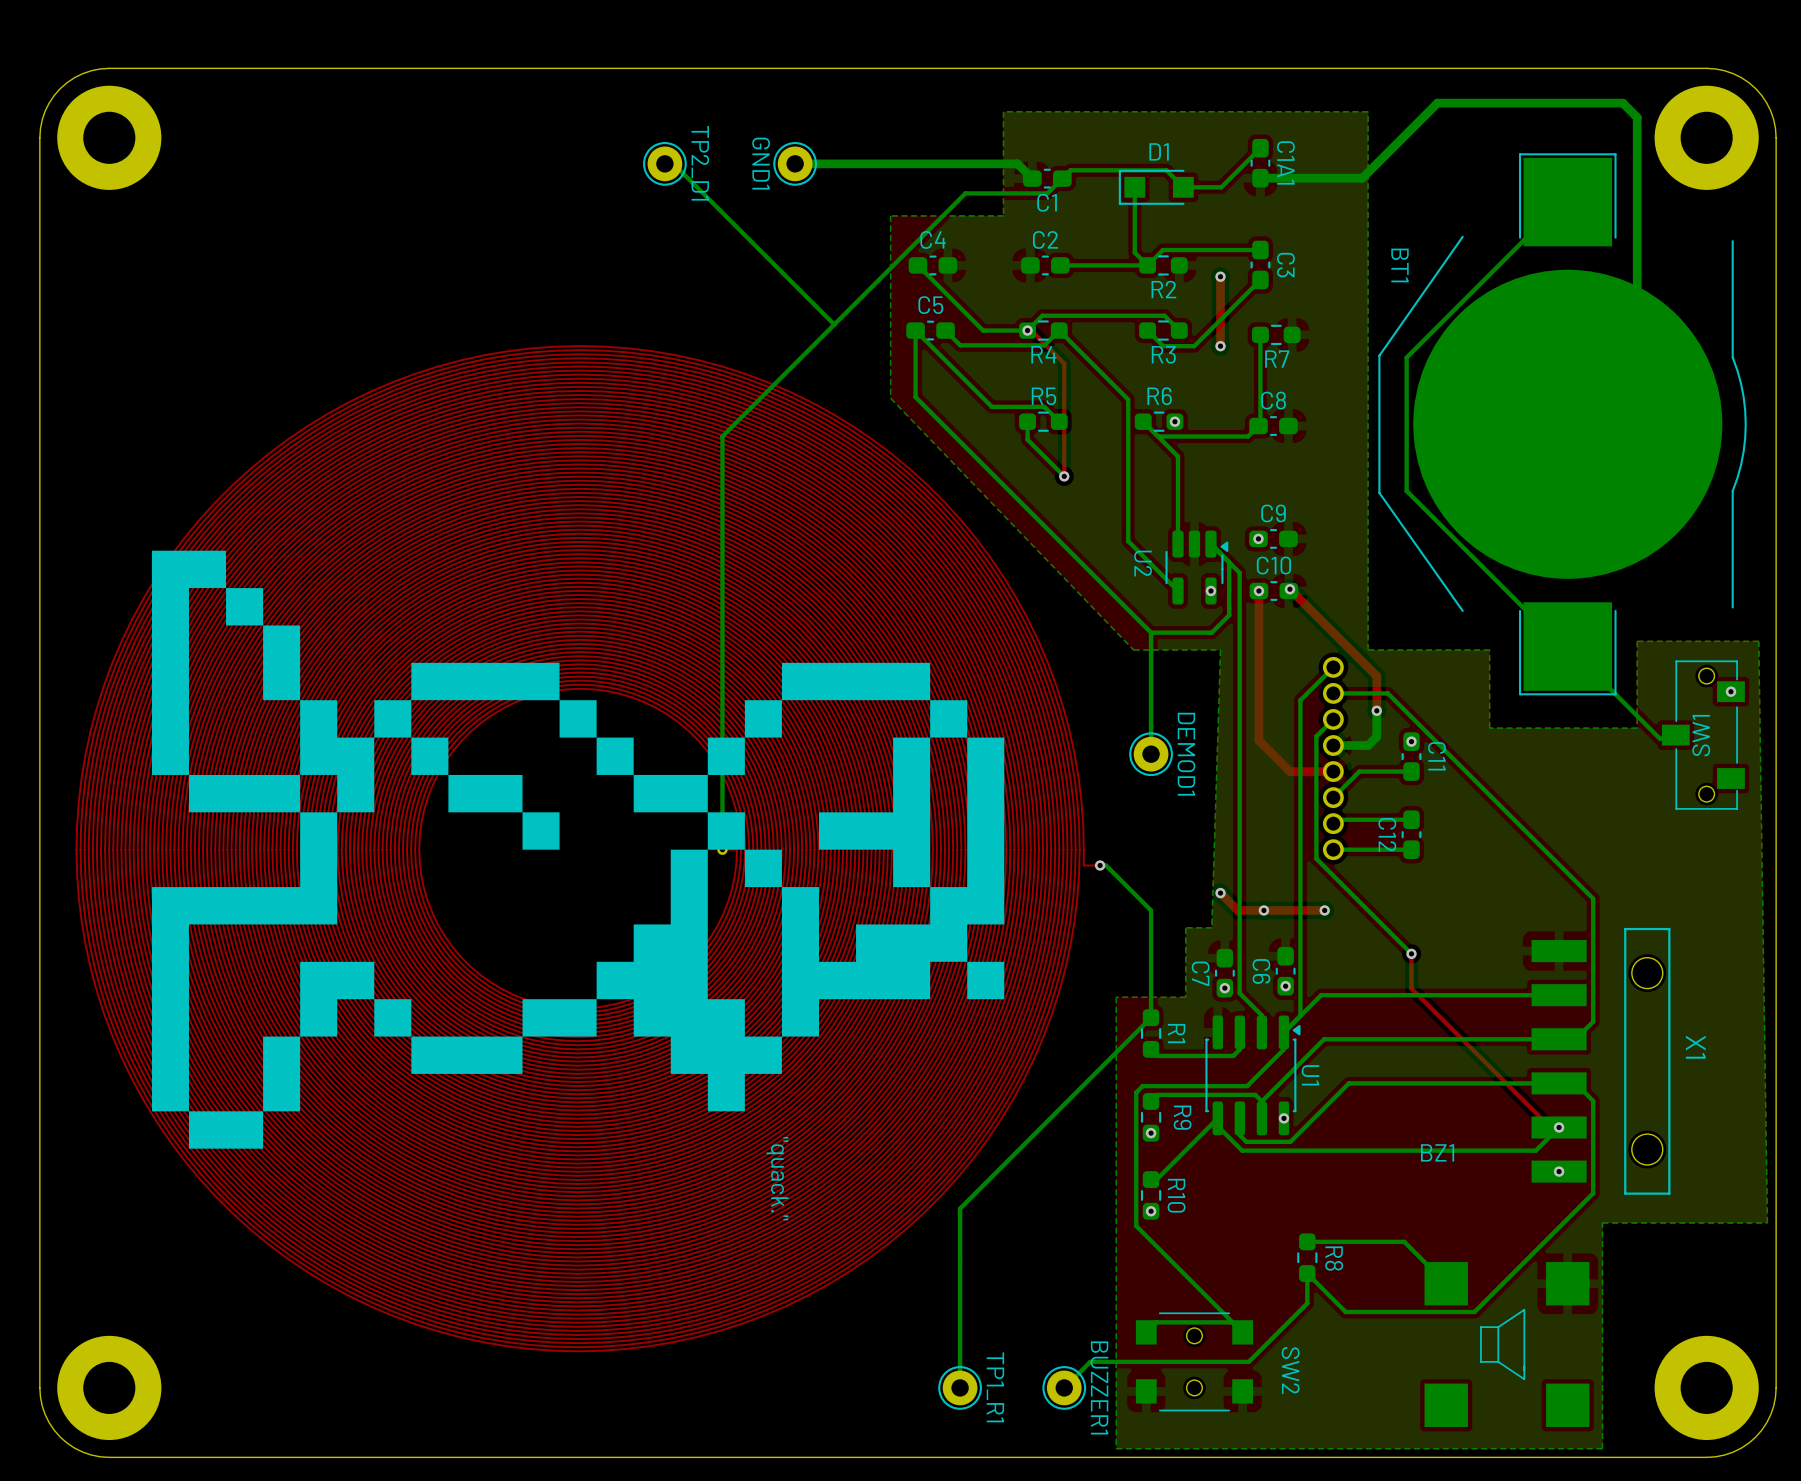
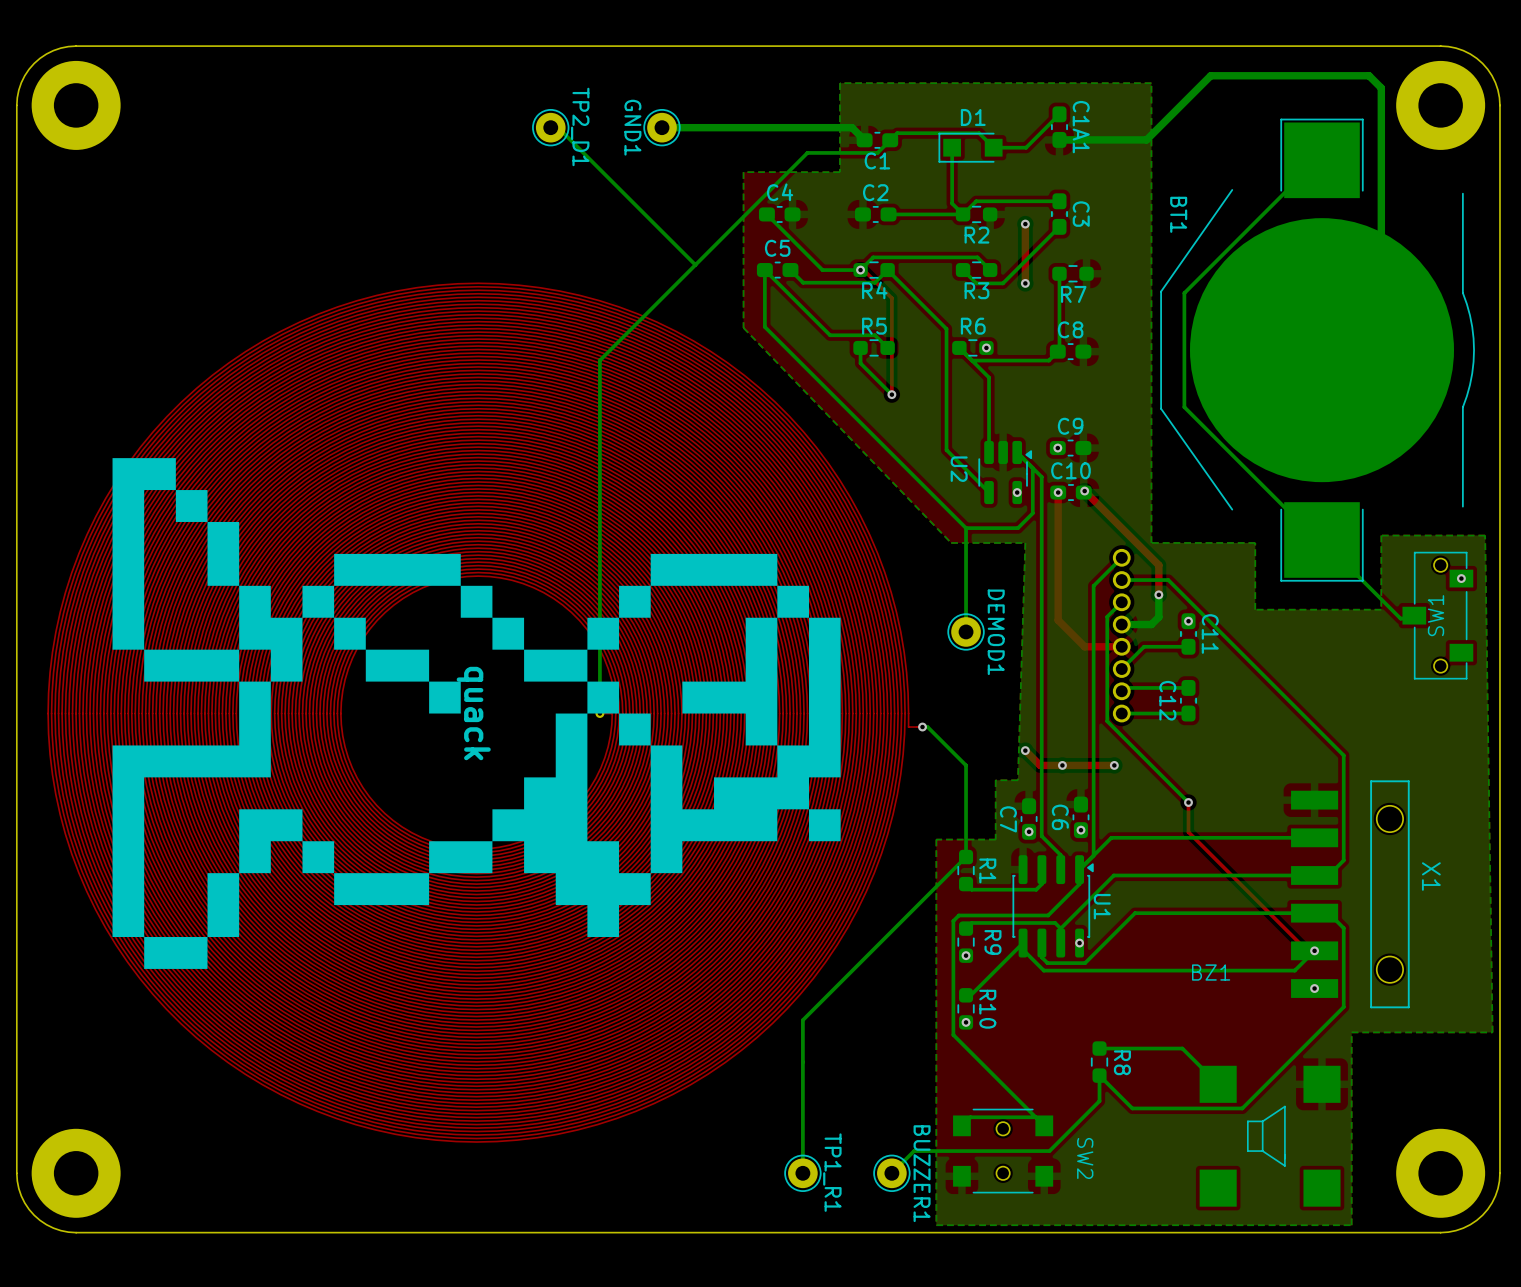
drawing: [151, 550, 1005, 1149] -> none
quack: none -> (476, 713)
text: "quack." (777, 1178) -> none

